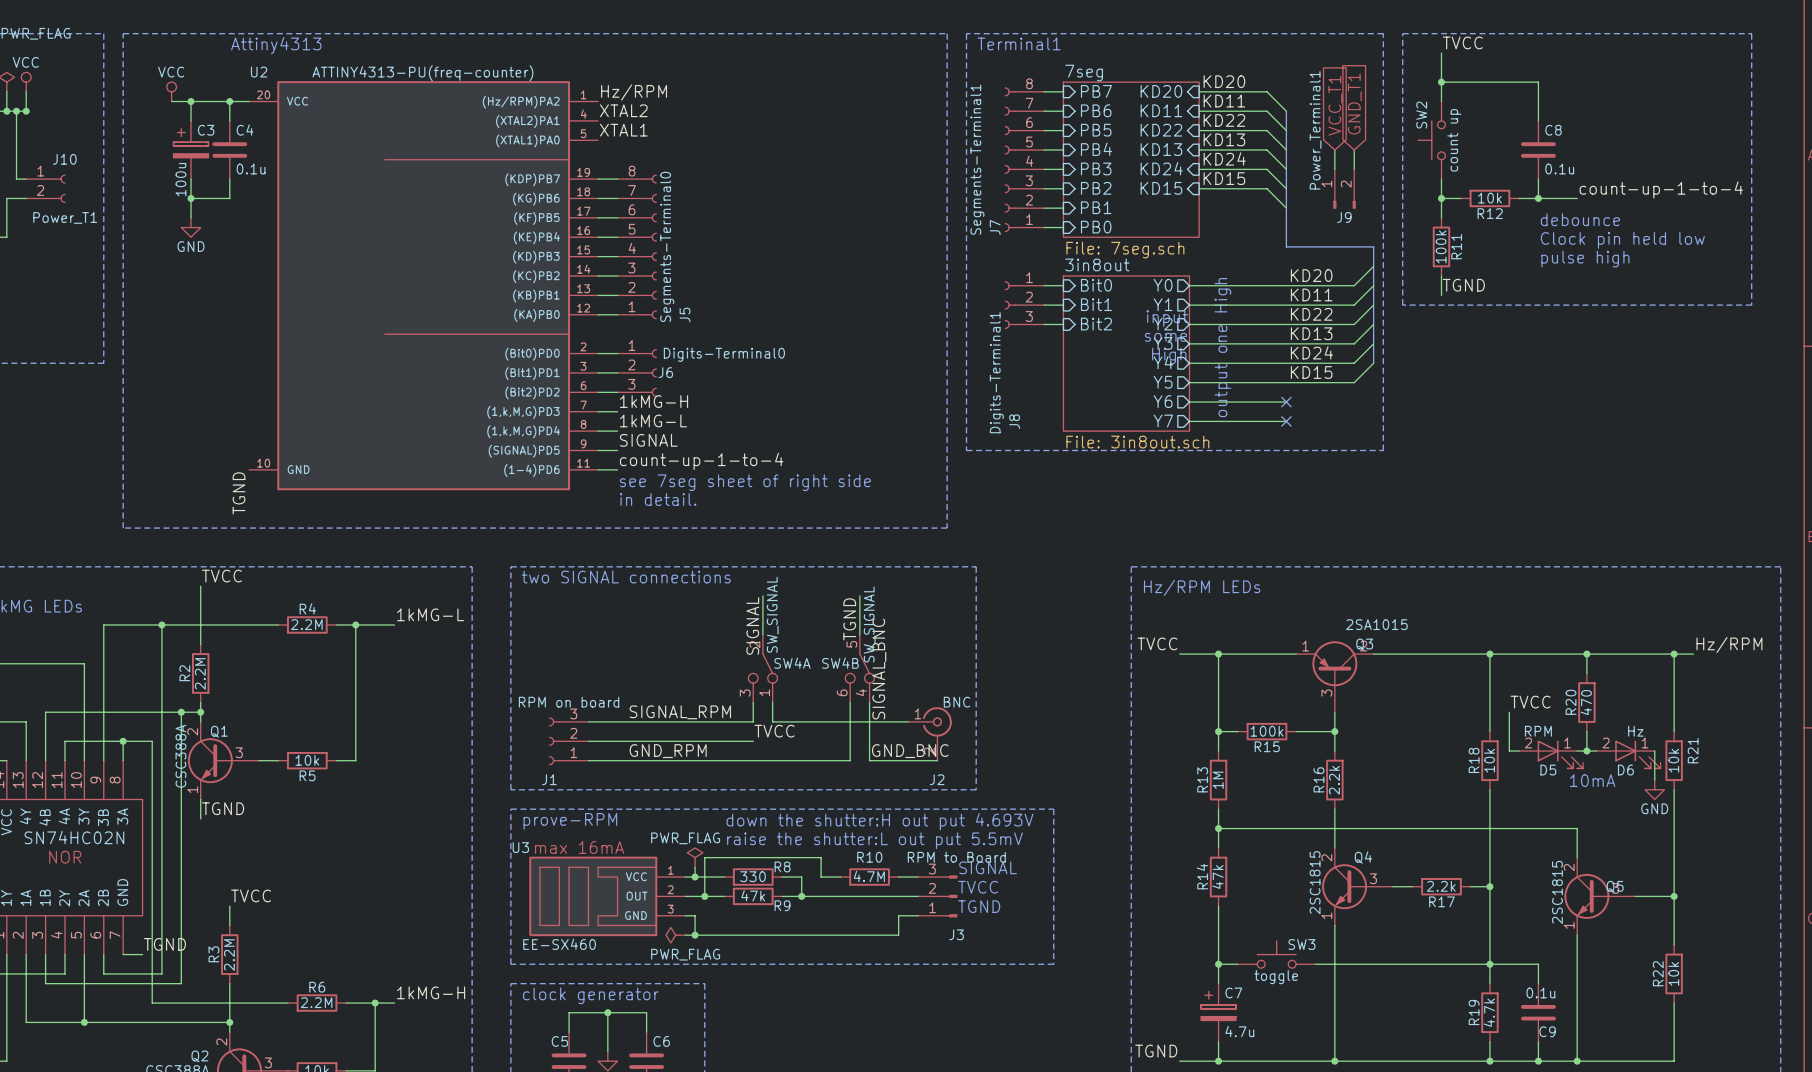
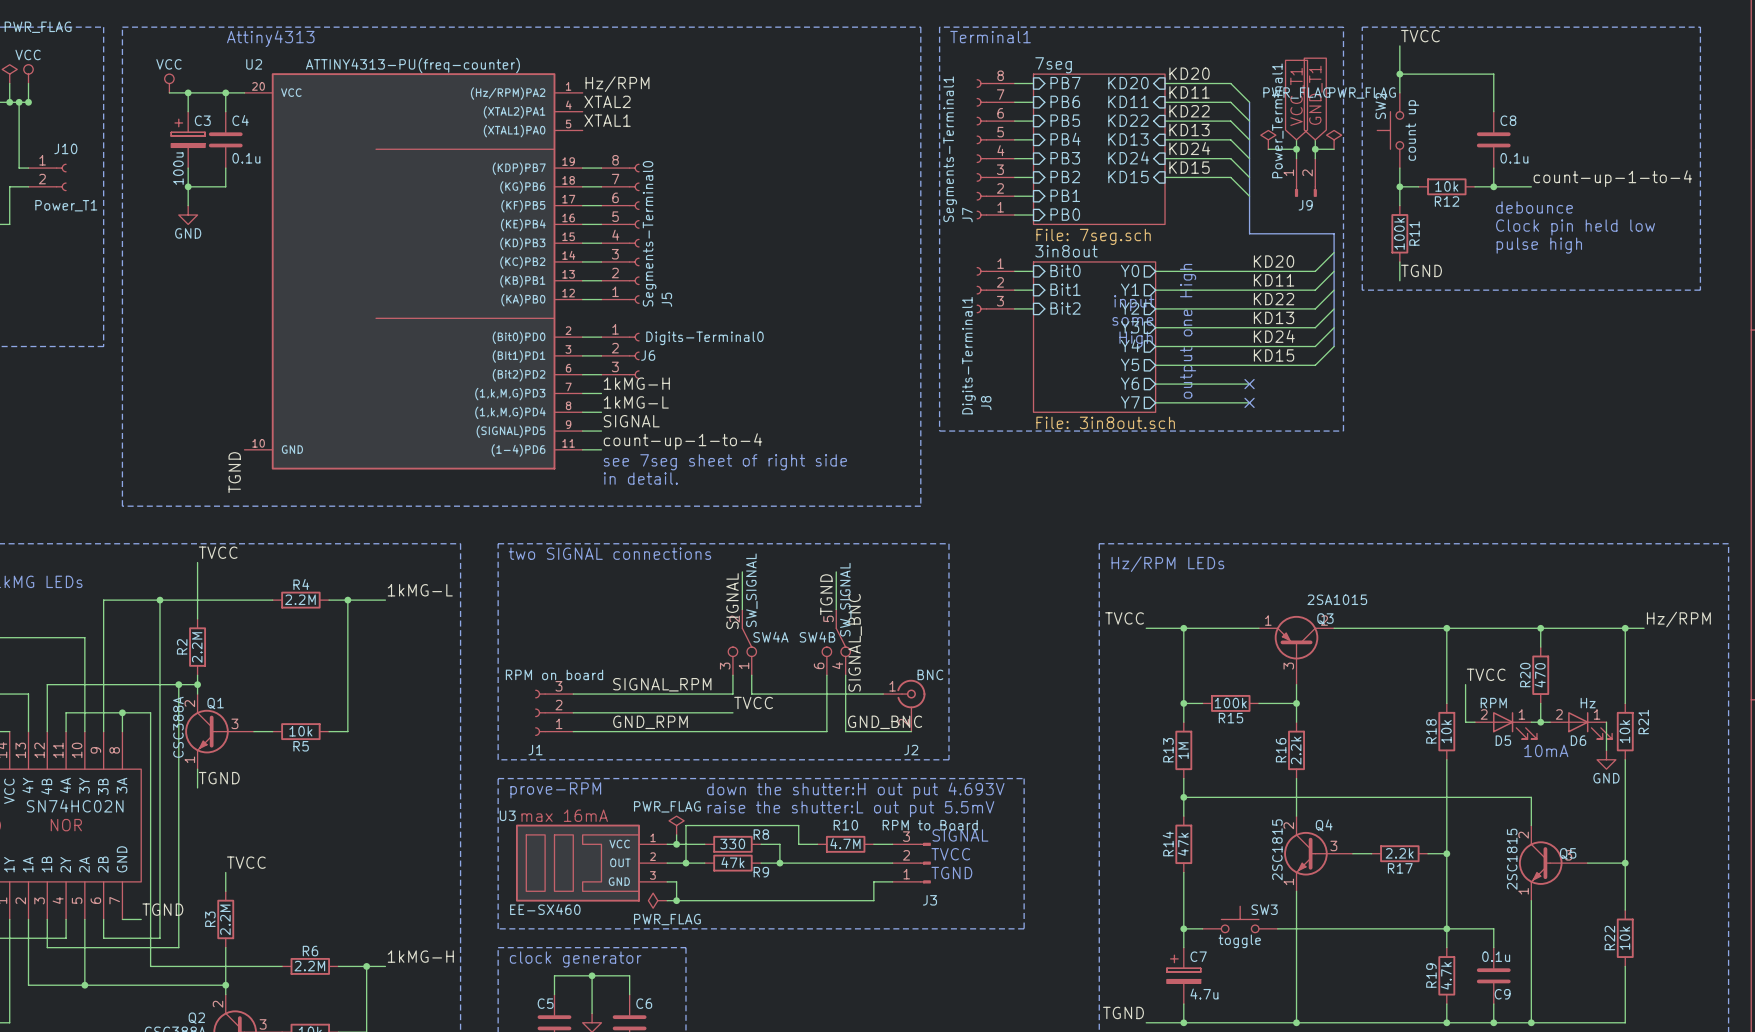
power symbol: none -> PWR_FLAG (1268, 139)
power symbol: none -> PWR_FLAG (1334, 139)
wire: none -> (1268, 149) (1296, 149)
junction: none -> (1296, 149)
wire: none -> (1315, 149) (1334, 149)
junction: none -> (1315, 149)

